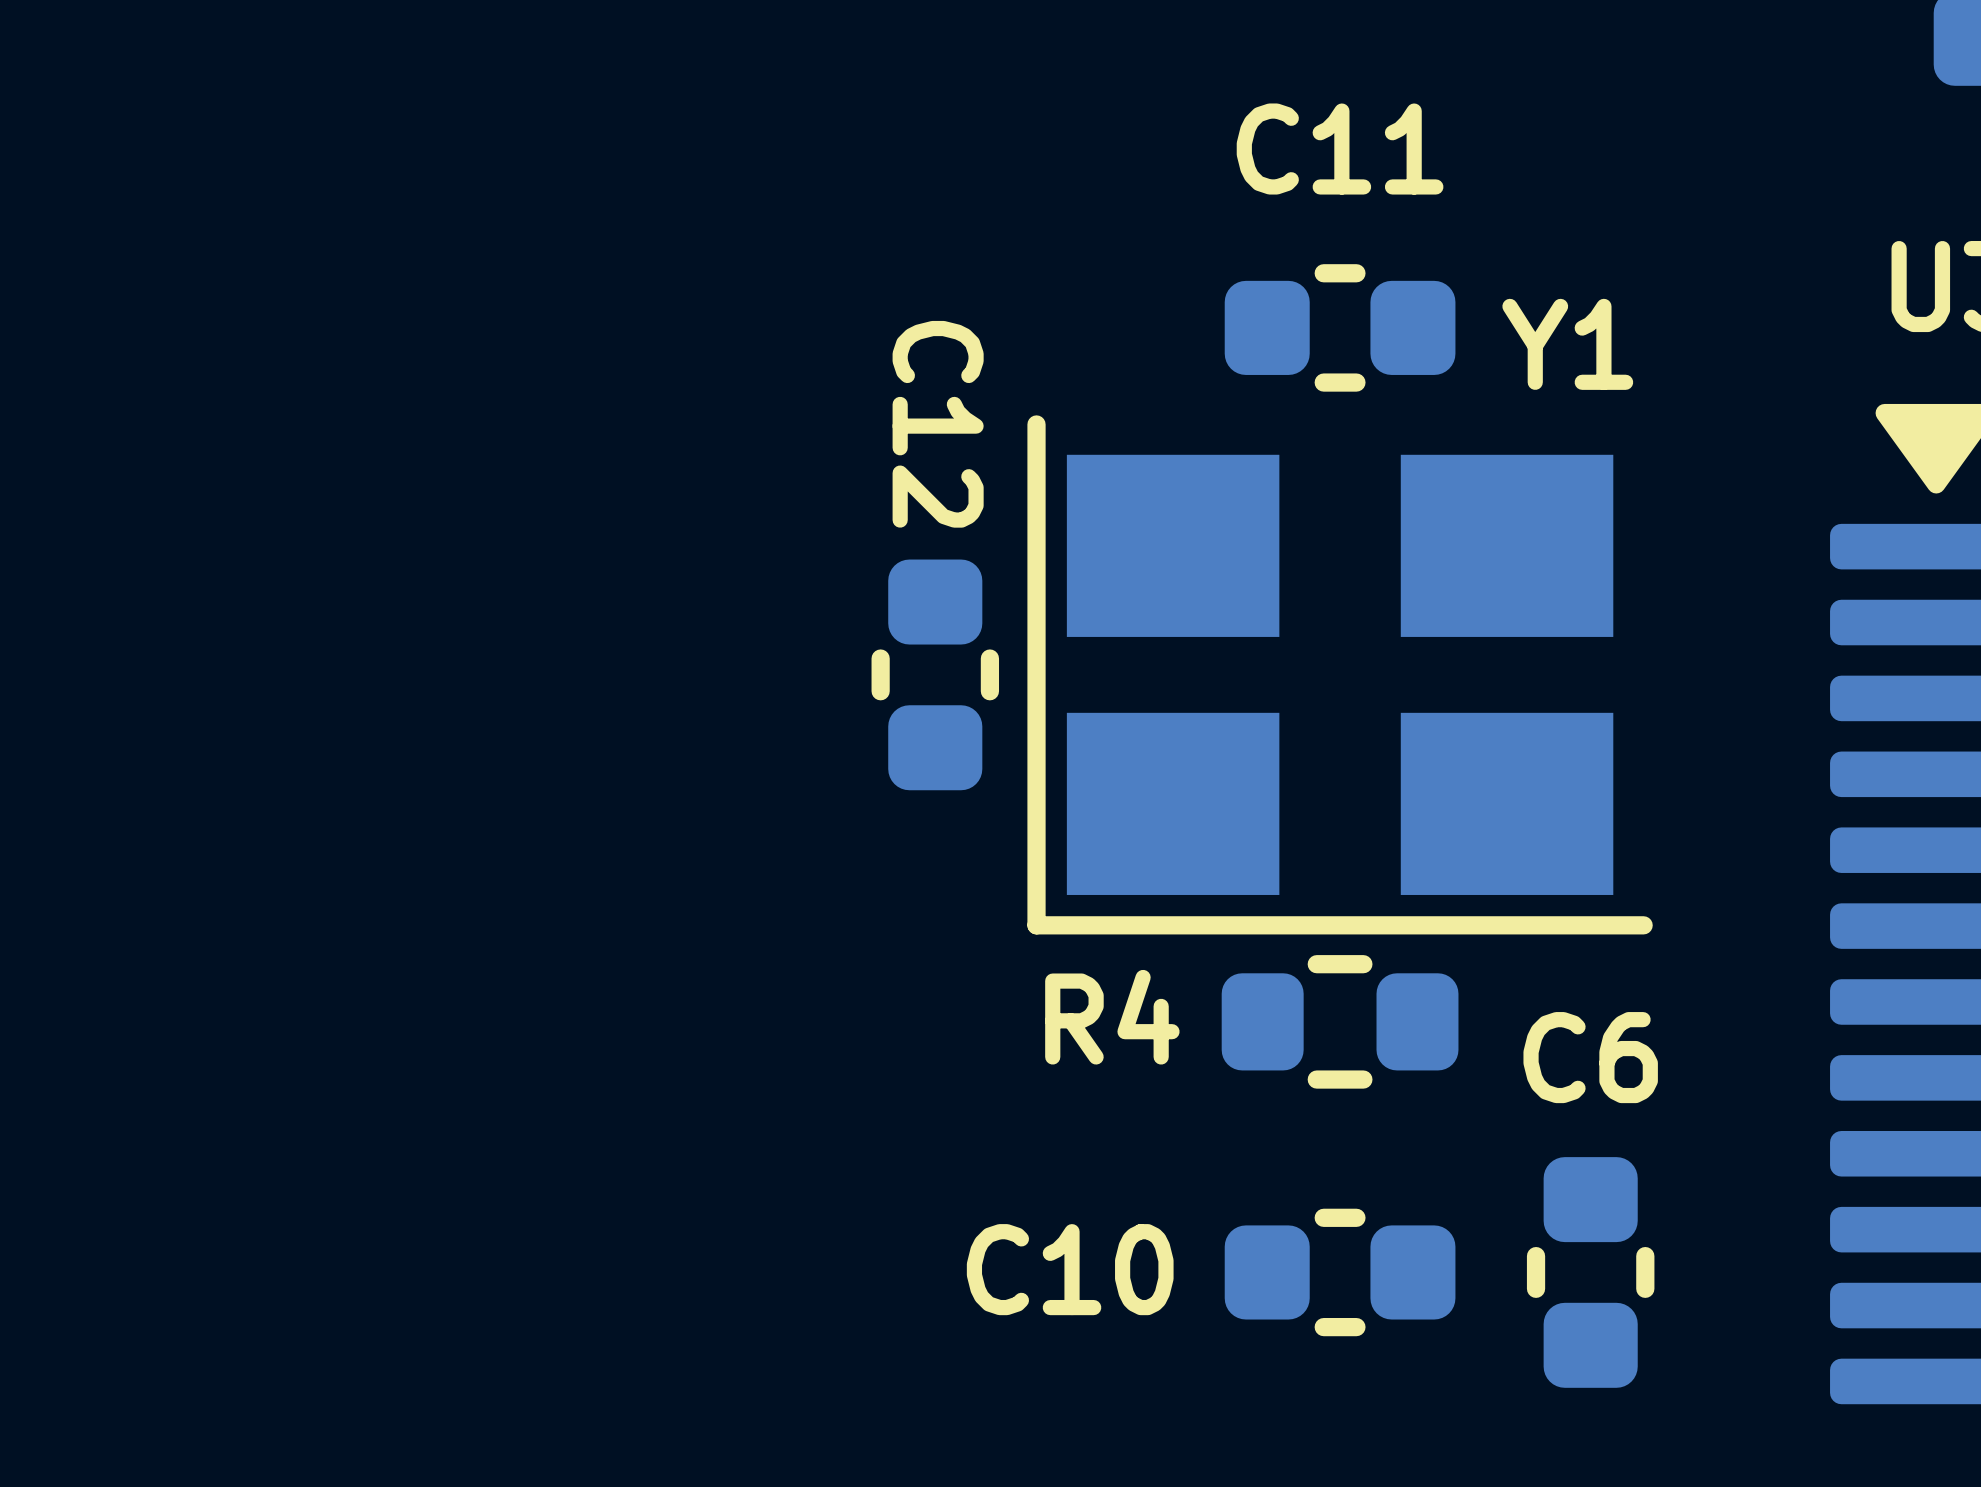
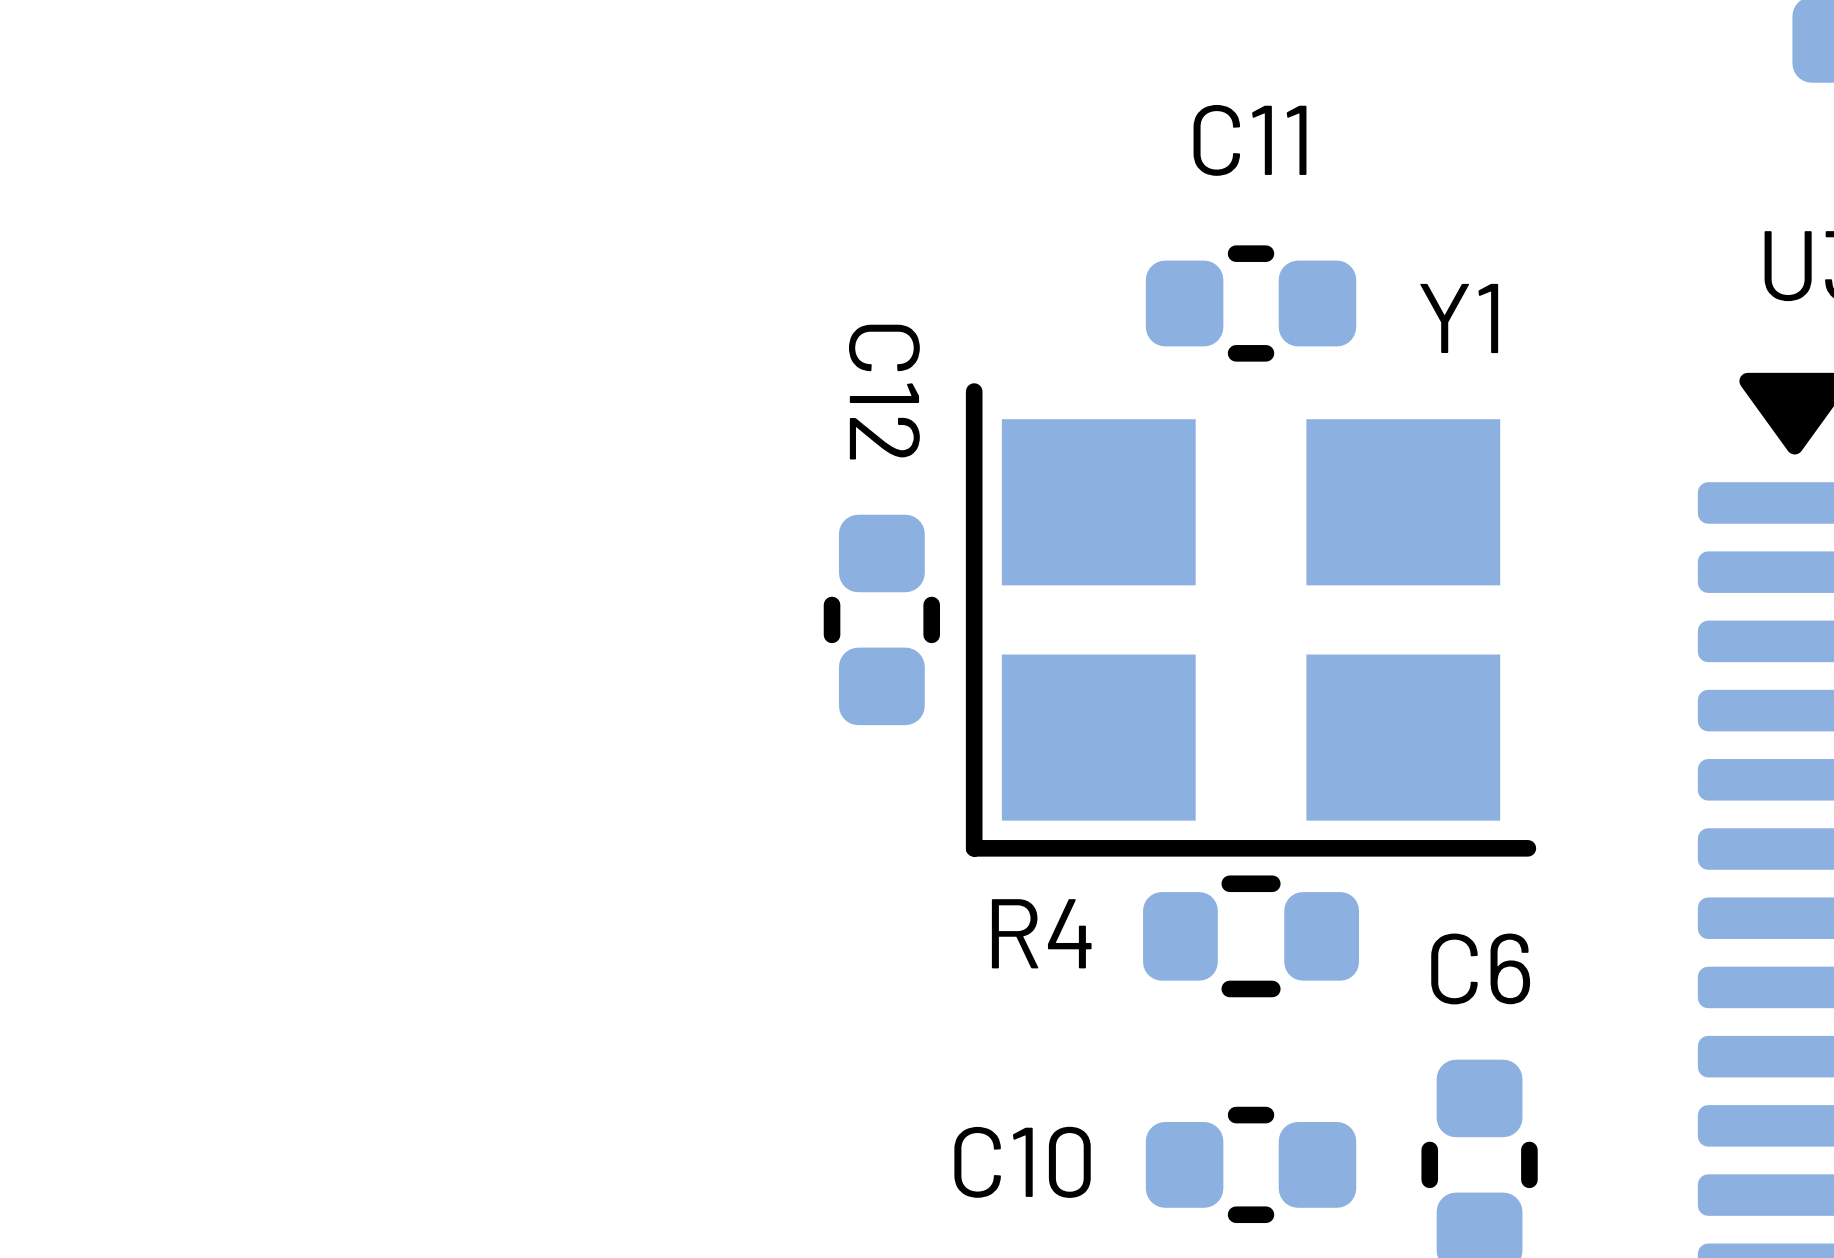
C10 name position: C10 (1070, 1269) -> C10 (1022, 1162)

